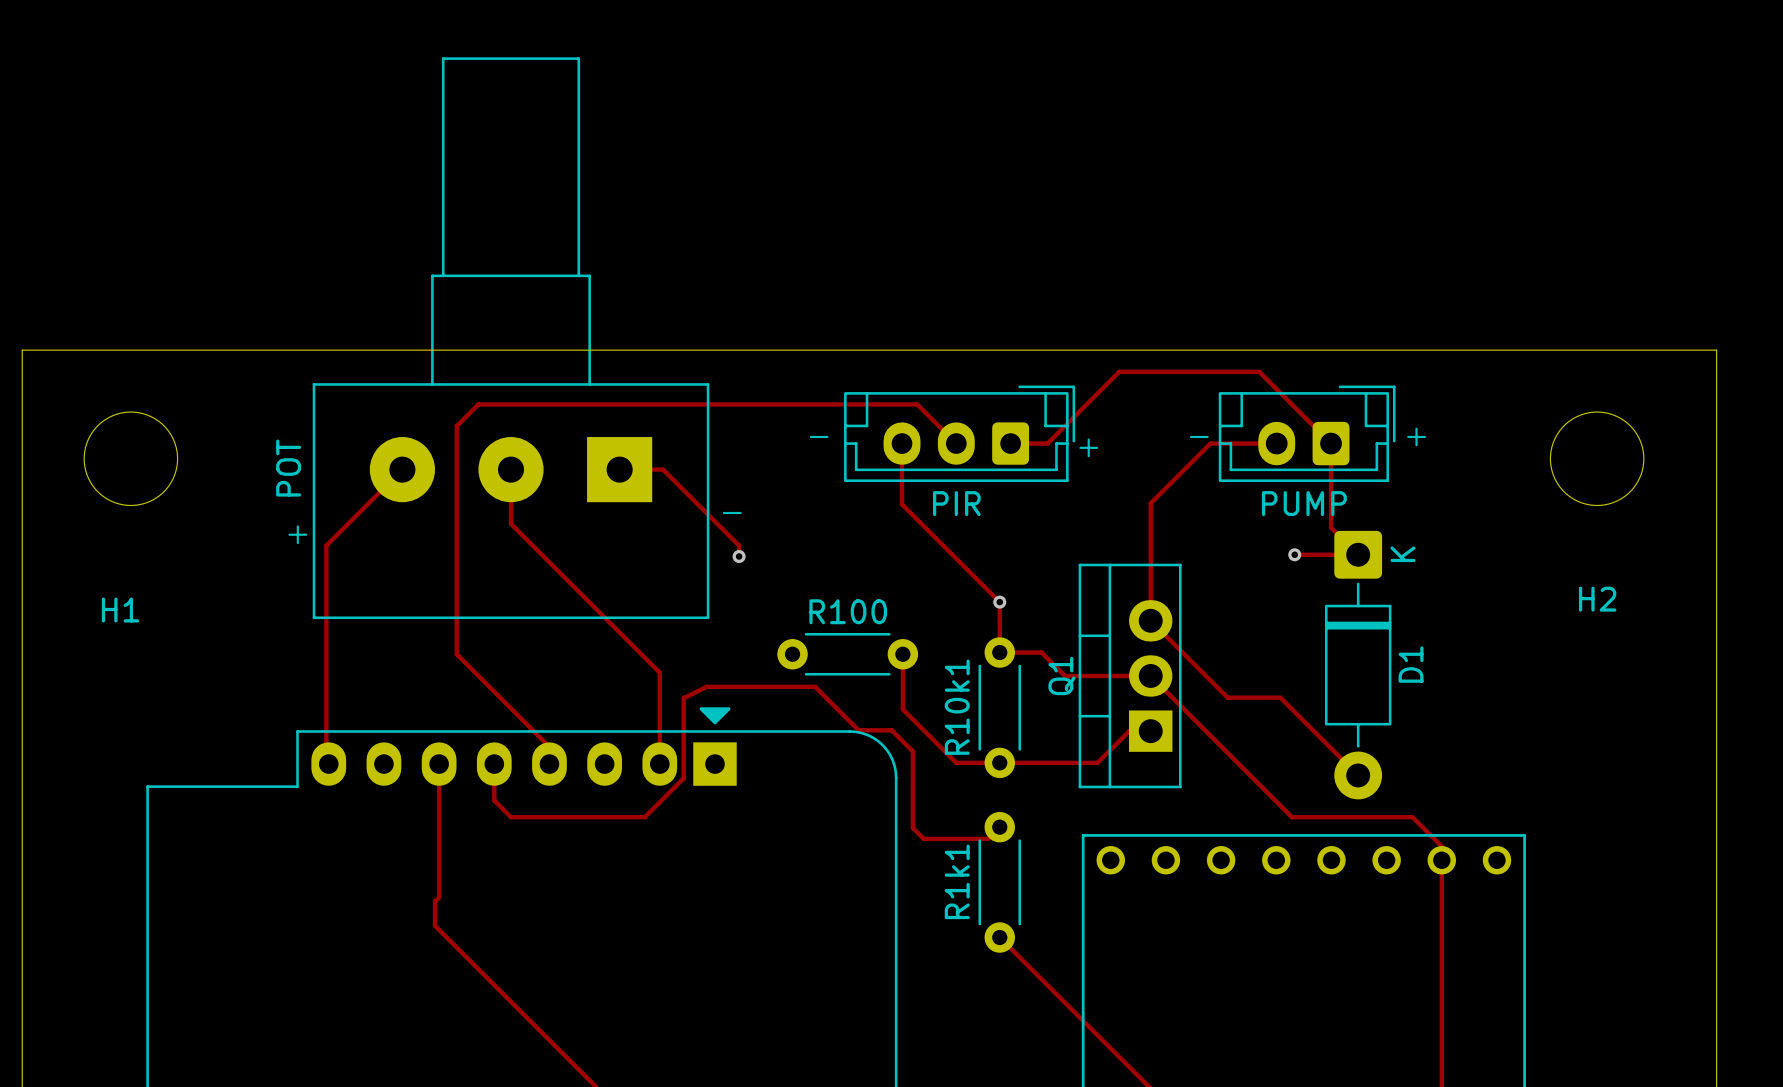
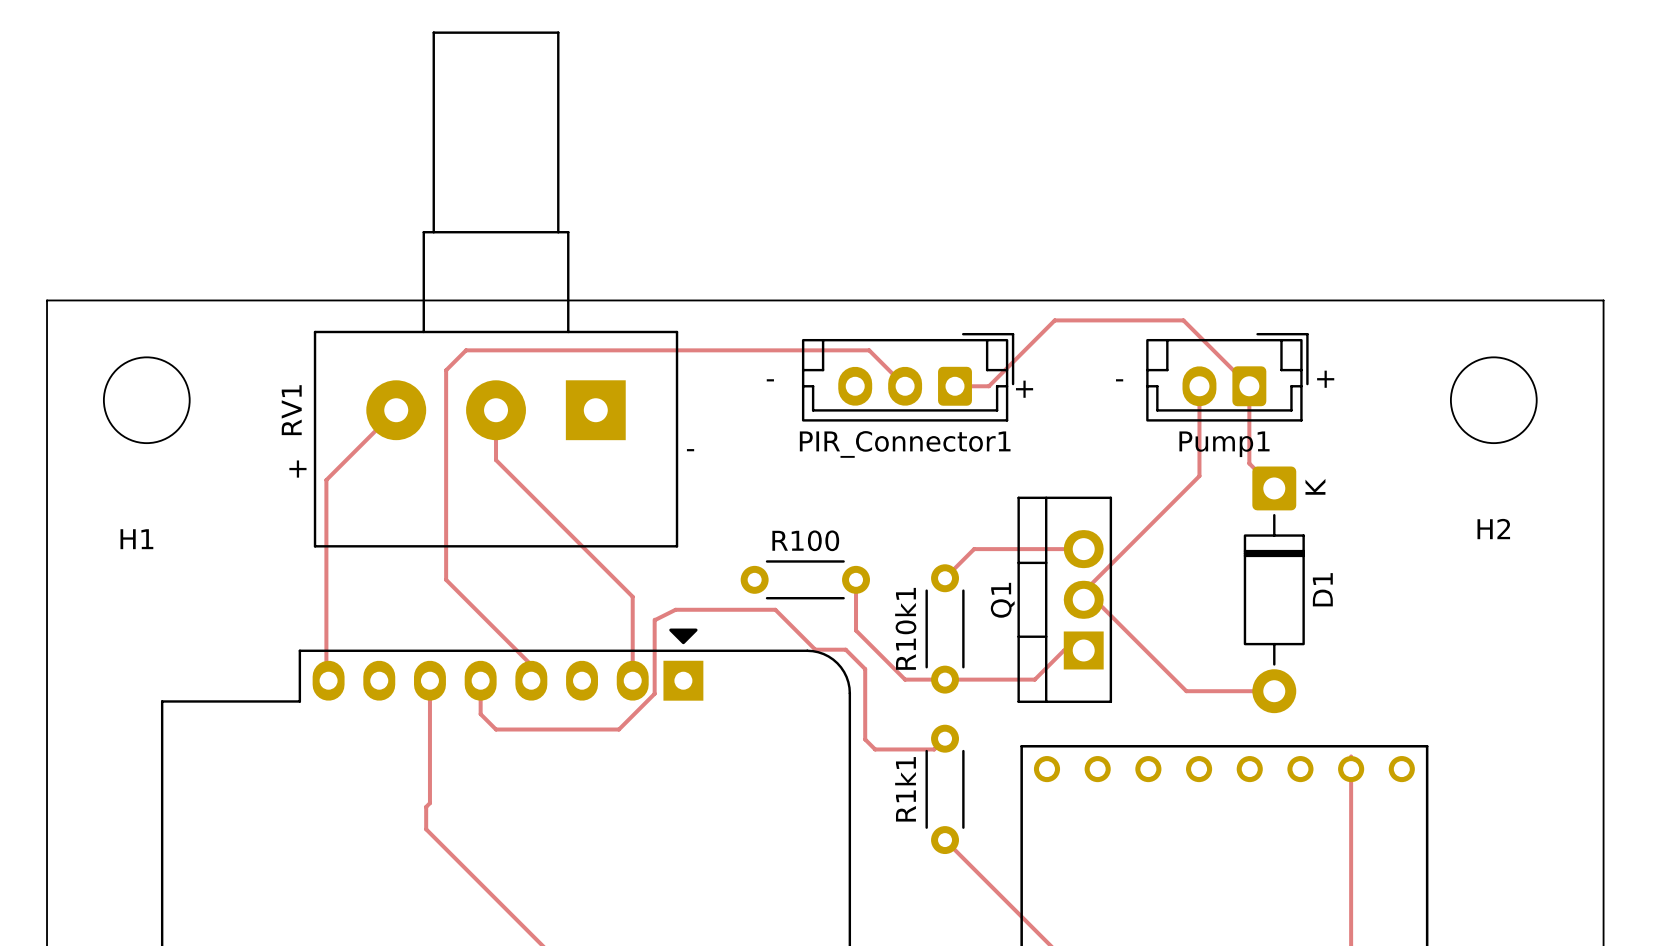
track: (902, 443) (902, 504) (999, 602) (999, 652) (1041, 652) (1064, 675) (1150, 675) (1291, 817) (1412, 817) (1441, 846) -> none
track: (1276, 443) (1210, 443) (1150, 503) (1150, 620) (1227, 697) (1280, 697) (1358, 775) -> (1199, 386) (1199, 476) (1083, 591)
POT name: POT (288, 468) -> RV1 (291, 410)
track: (619, 469) (663, 469) (739, 545) (739, 556) -> none
PIR name: PIR (956, 503) -> PIR_Connector1 (905, 444)
PUMP name: PUMP (1304, 503) -> Pump1 (1224, 444)
via: (1294, 554) -> none
track: (1358, 554) (1294, 554) (1293, 556) -> none
via: (739, 556) -> none
via: (999, 602) -> none
track: none -> (1083, 549) (974, 549) (945, 578)
track: none -> (1089, 594) (1186, 691) (1274, 691)

